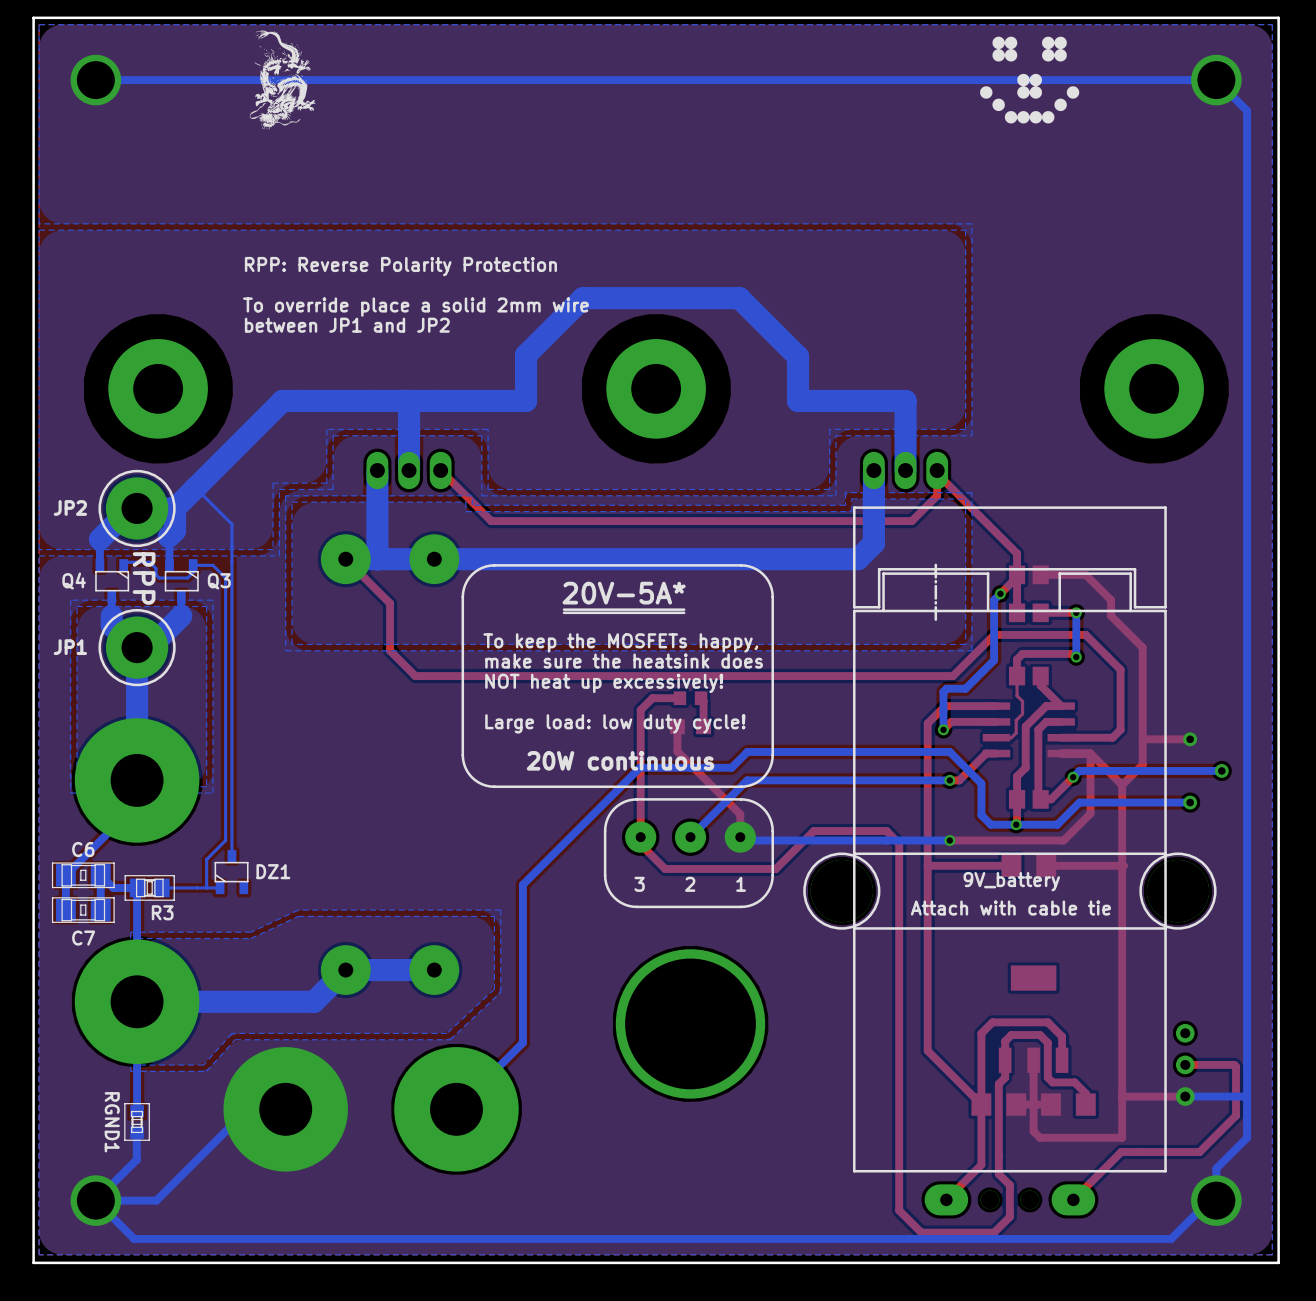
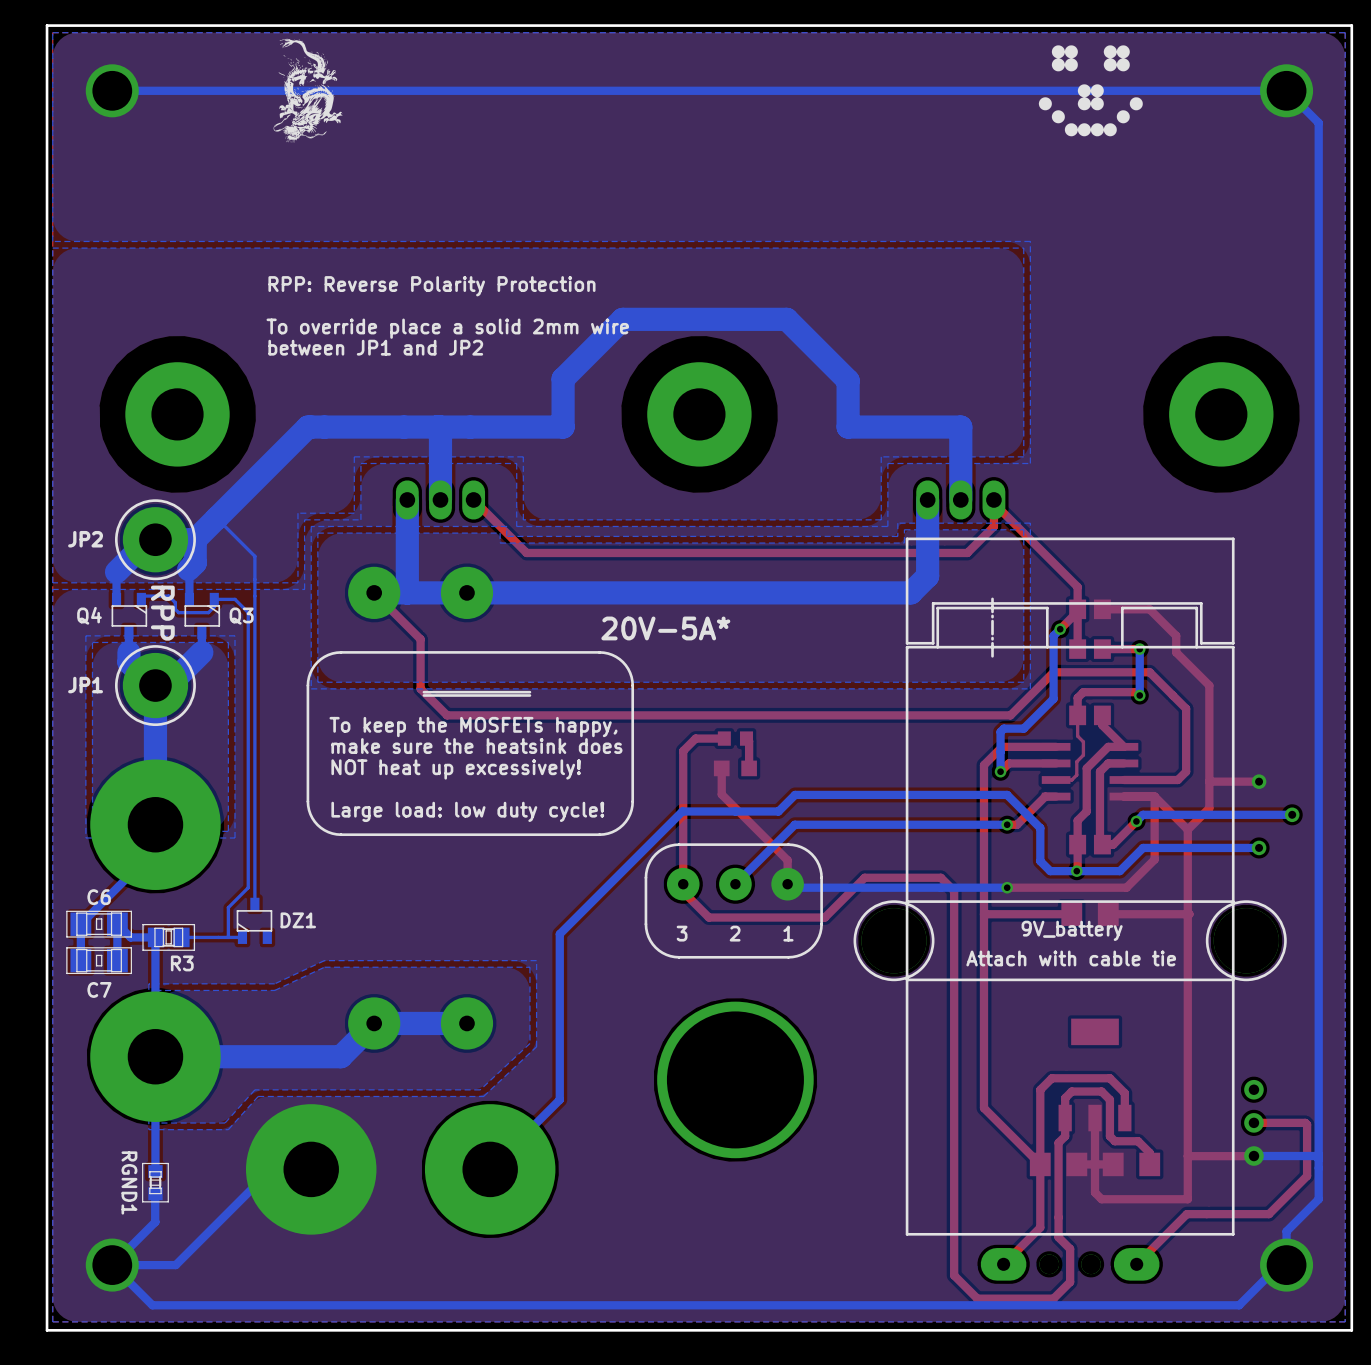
line: (741, 565) (494, 565) (486, 566) (475, 571) (465, 584) (462, 597) (462, 755) (463, 763) (469, 774) (482, 784) (494, 786) (741, 786) (753, 784) (760, 780) (768, 770) (772, 755) (772, 592) (768, 581) (763, 574) (753, 567) (741, 565) -> none
line: (684, 609) (564, 609) -> none
line: (684, 612) (564, 612) -> none
line: none -> (599, 652) (341, 652) (324, 656) (312, 668) (308, 681) (307, 801) (312, 818) (324, 830) (341, 834) (599, 834) (616, 830) (625, 821) (632, 805) (632, 681) (628, 668) (622, 662) (612, 654) (599, 652)
text position: To keep the MOSFETs happy, (620, 642) -> To keep the MOSFETs happy, (473, 727)
line: none -> (529, 692) (423, 692)
line: none -> (529, 695) (423, 695)
text position: make sure the heatsink does (624, 661) -> make sure the heatsink does (476, 746)
text position: NOT heat up excessively! (604, 683) -> NOT heat up excessively! (456, 769)
text position: Large load: low duty cycle! (615, 723) -> Large load: low duty cycle! (467, 811)
text: 20W continuous (620, 760) -> none

